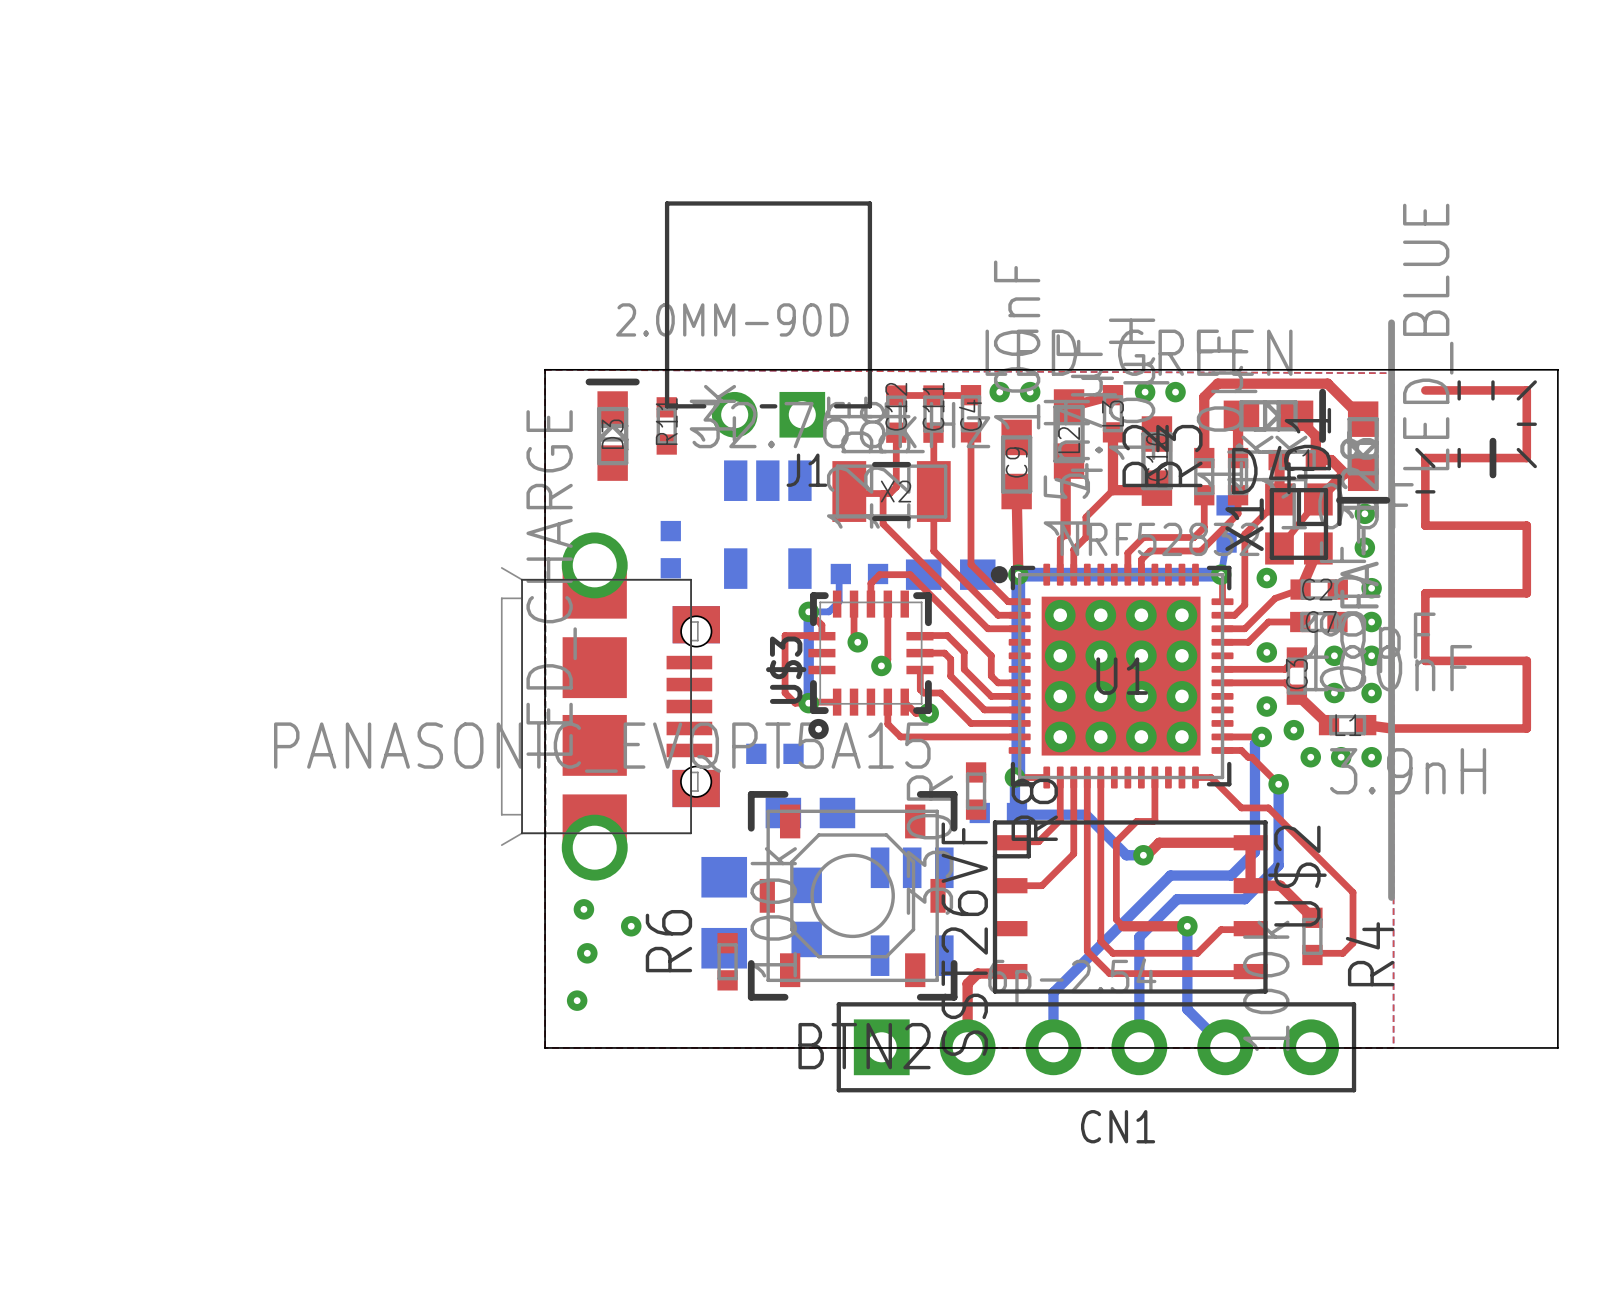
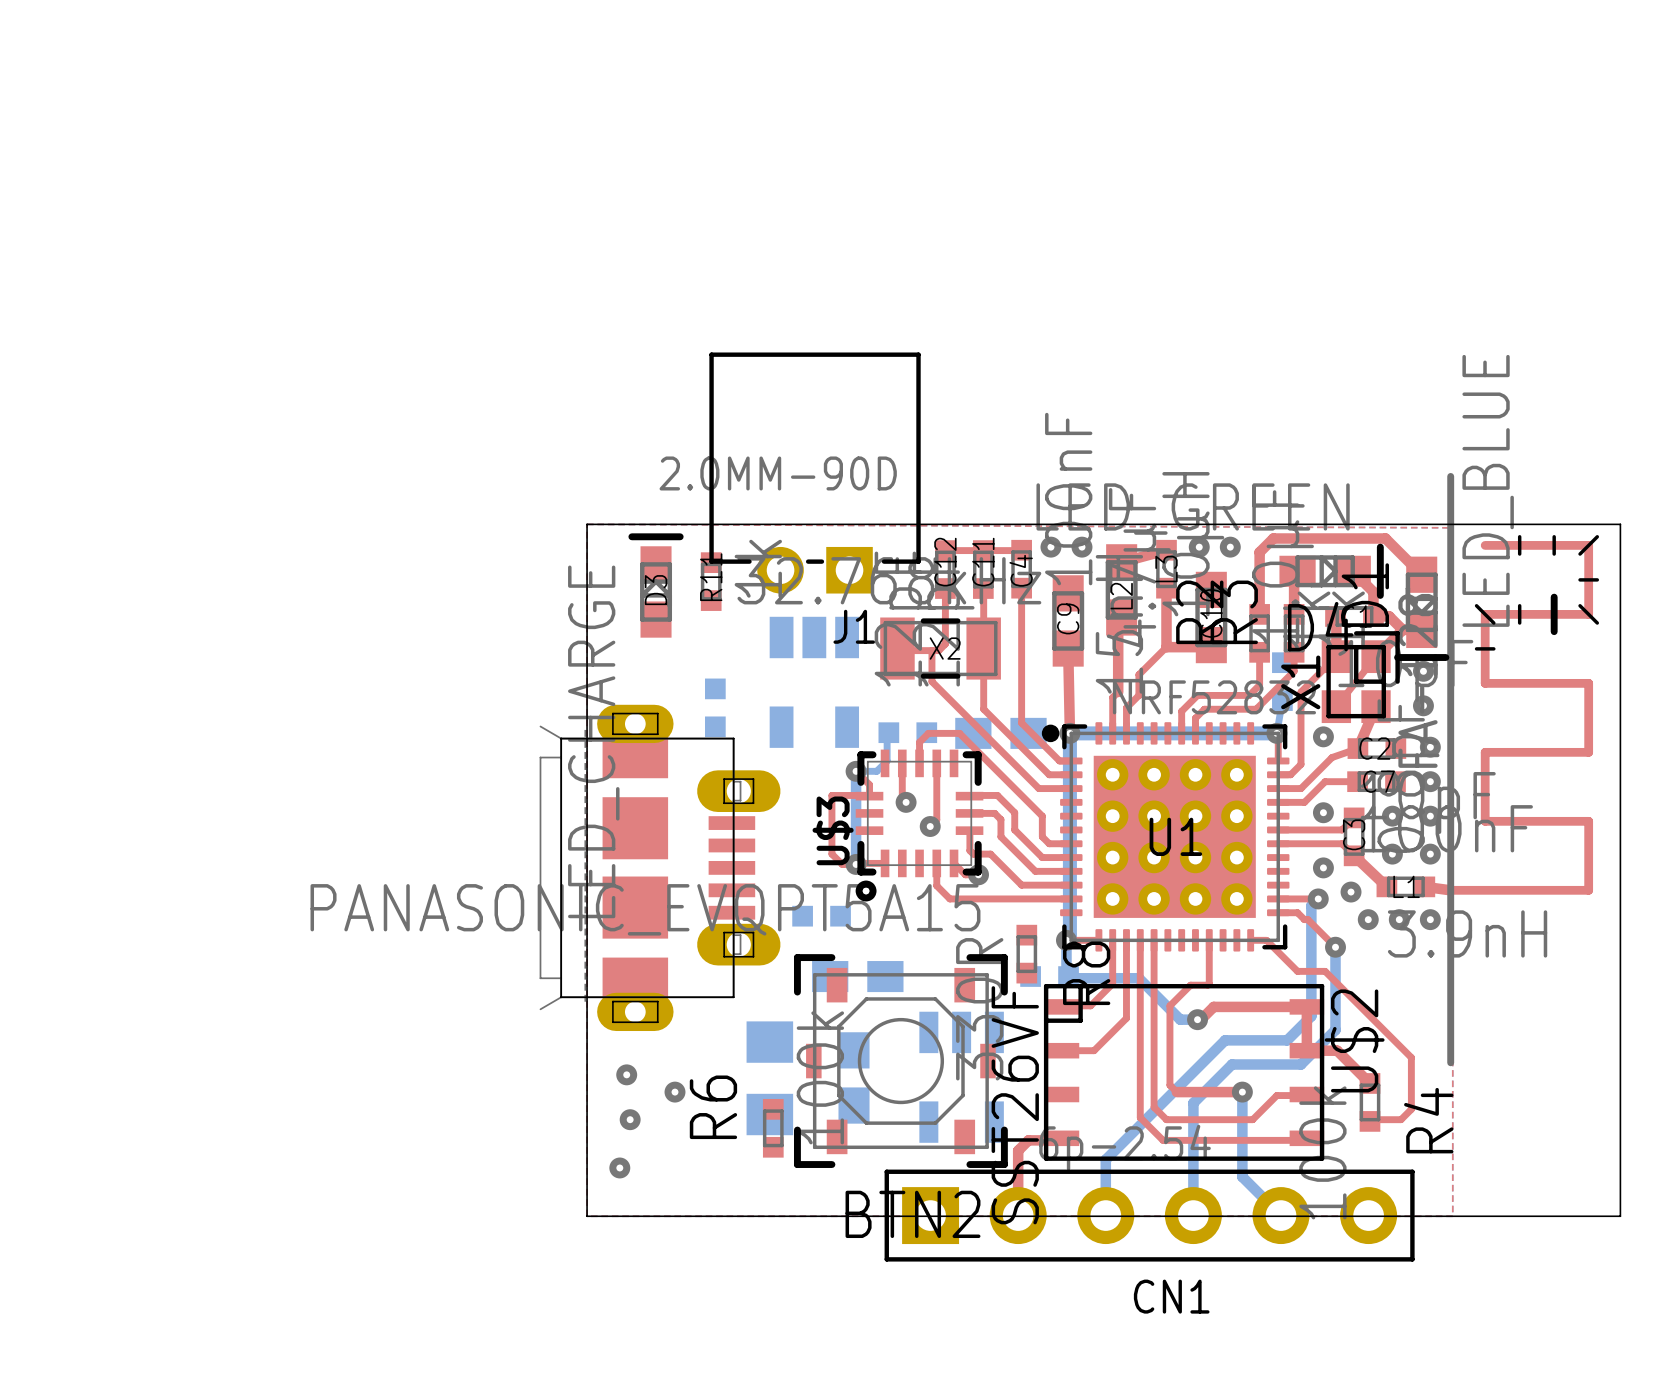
part footprint: [500, 532, 720, 881] -> [539, 704, 781, 1032]

